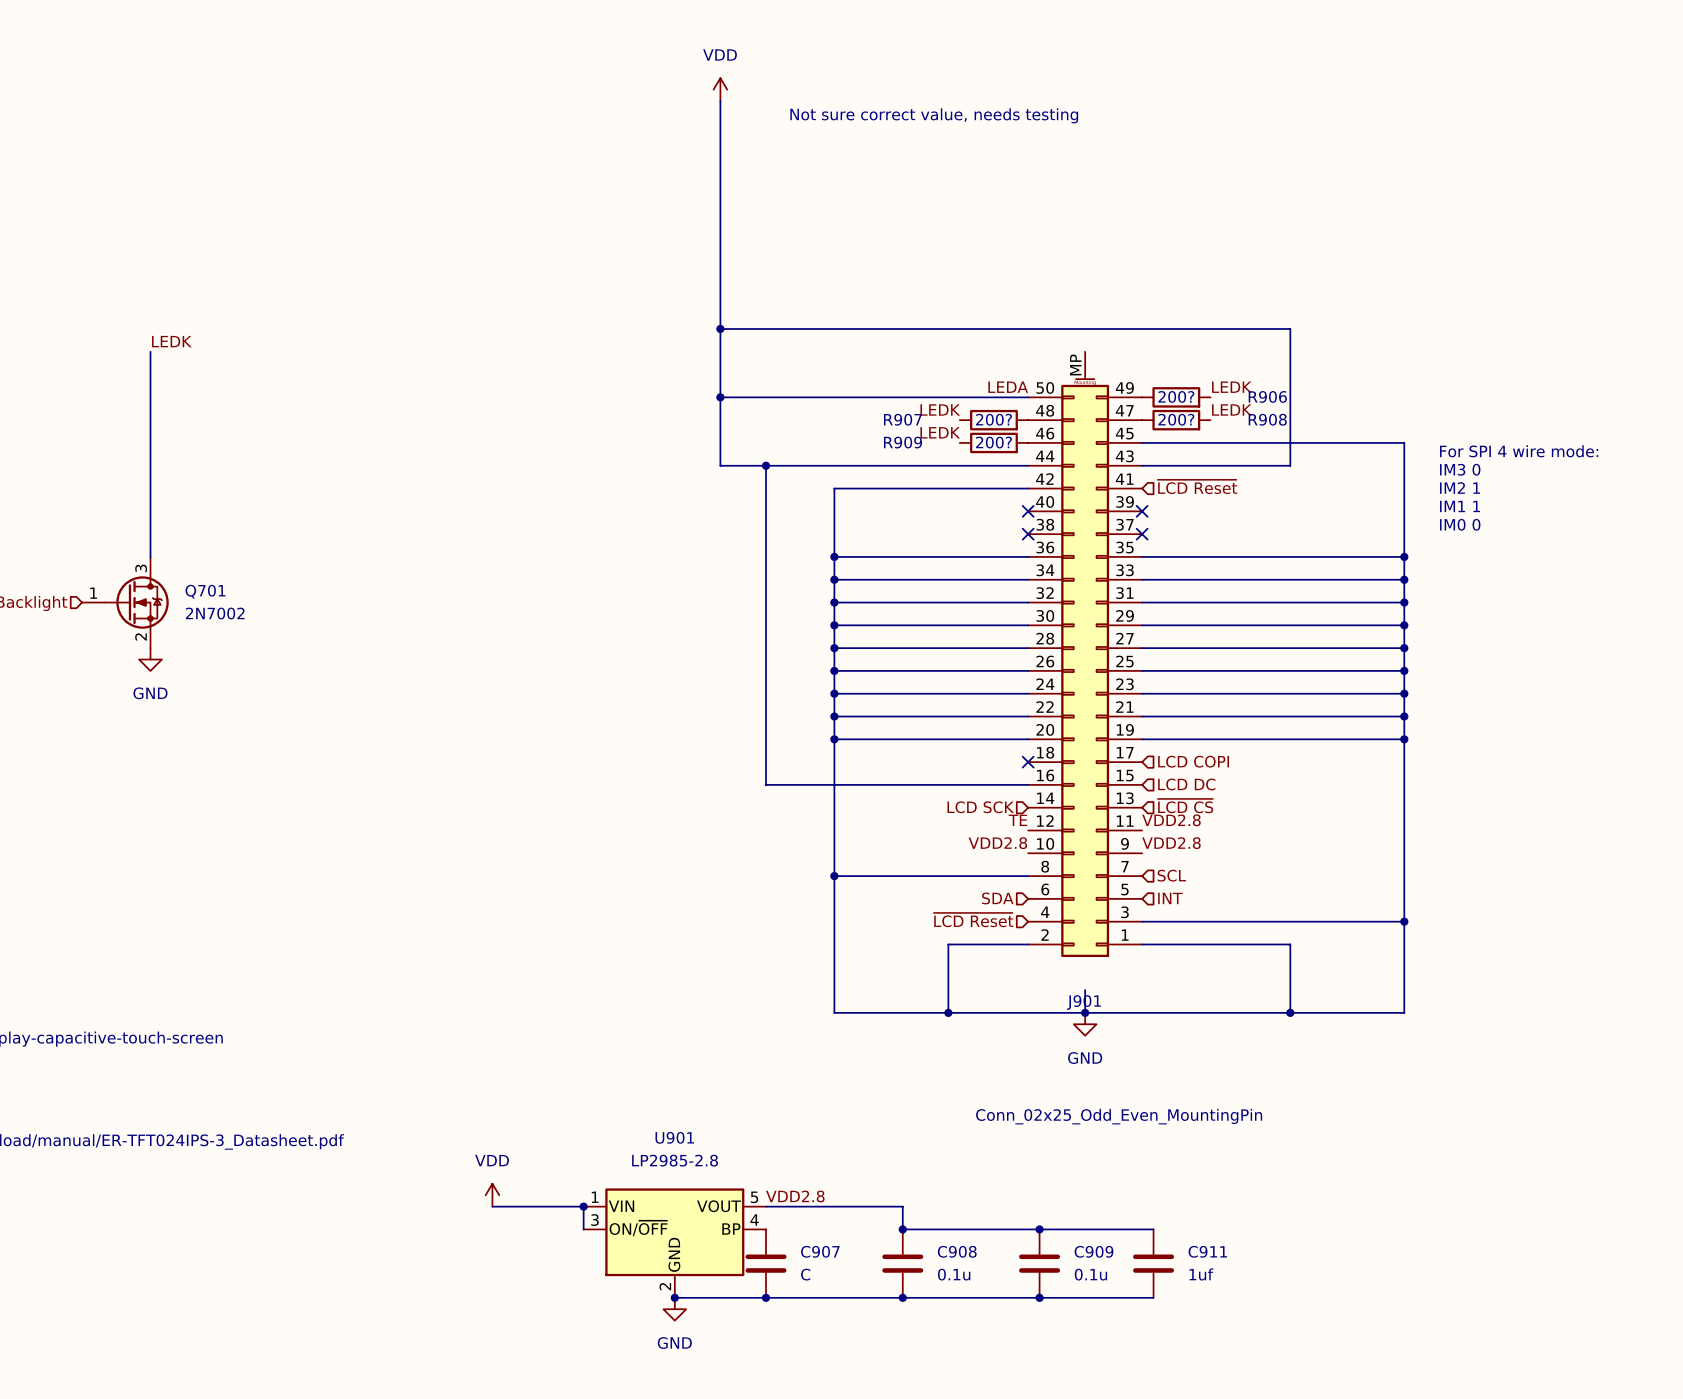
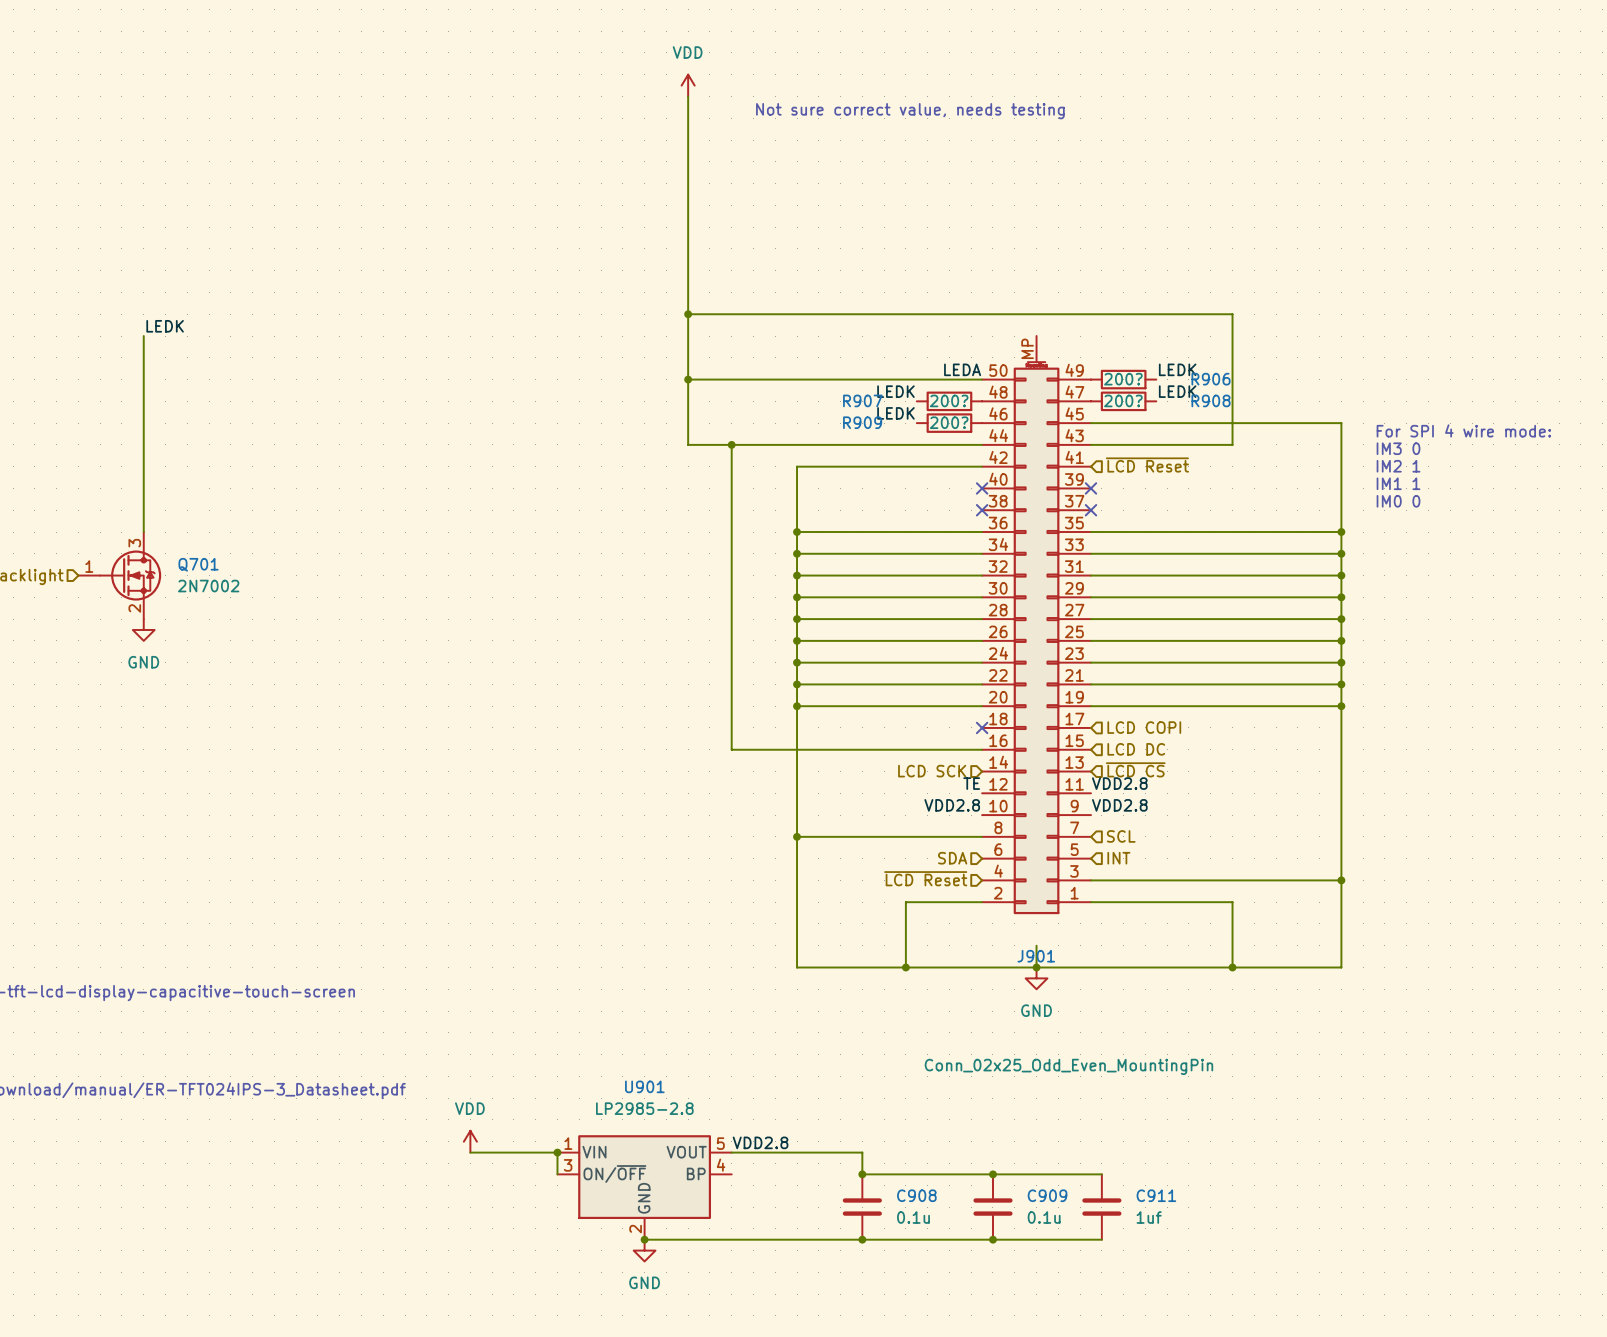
C907: C (766, 1263) -> none
junction: (766, 1297) -> none

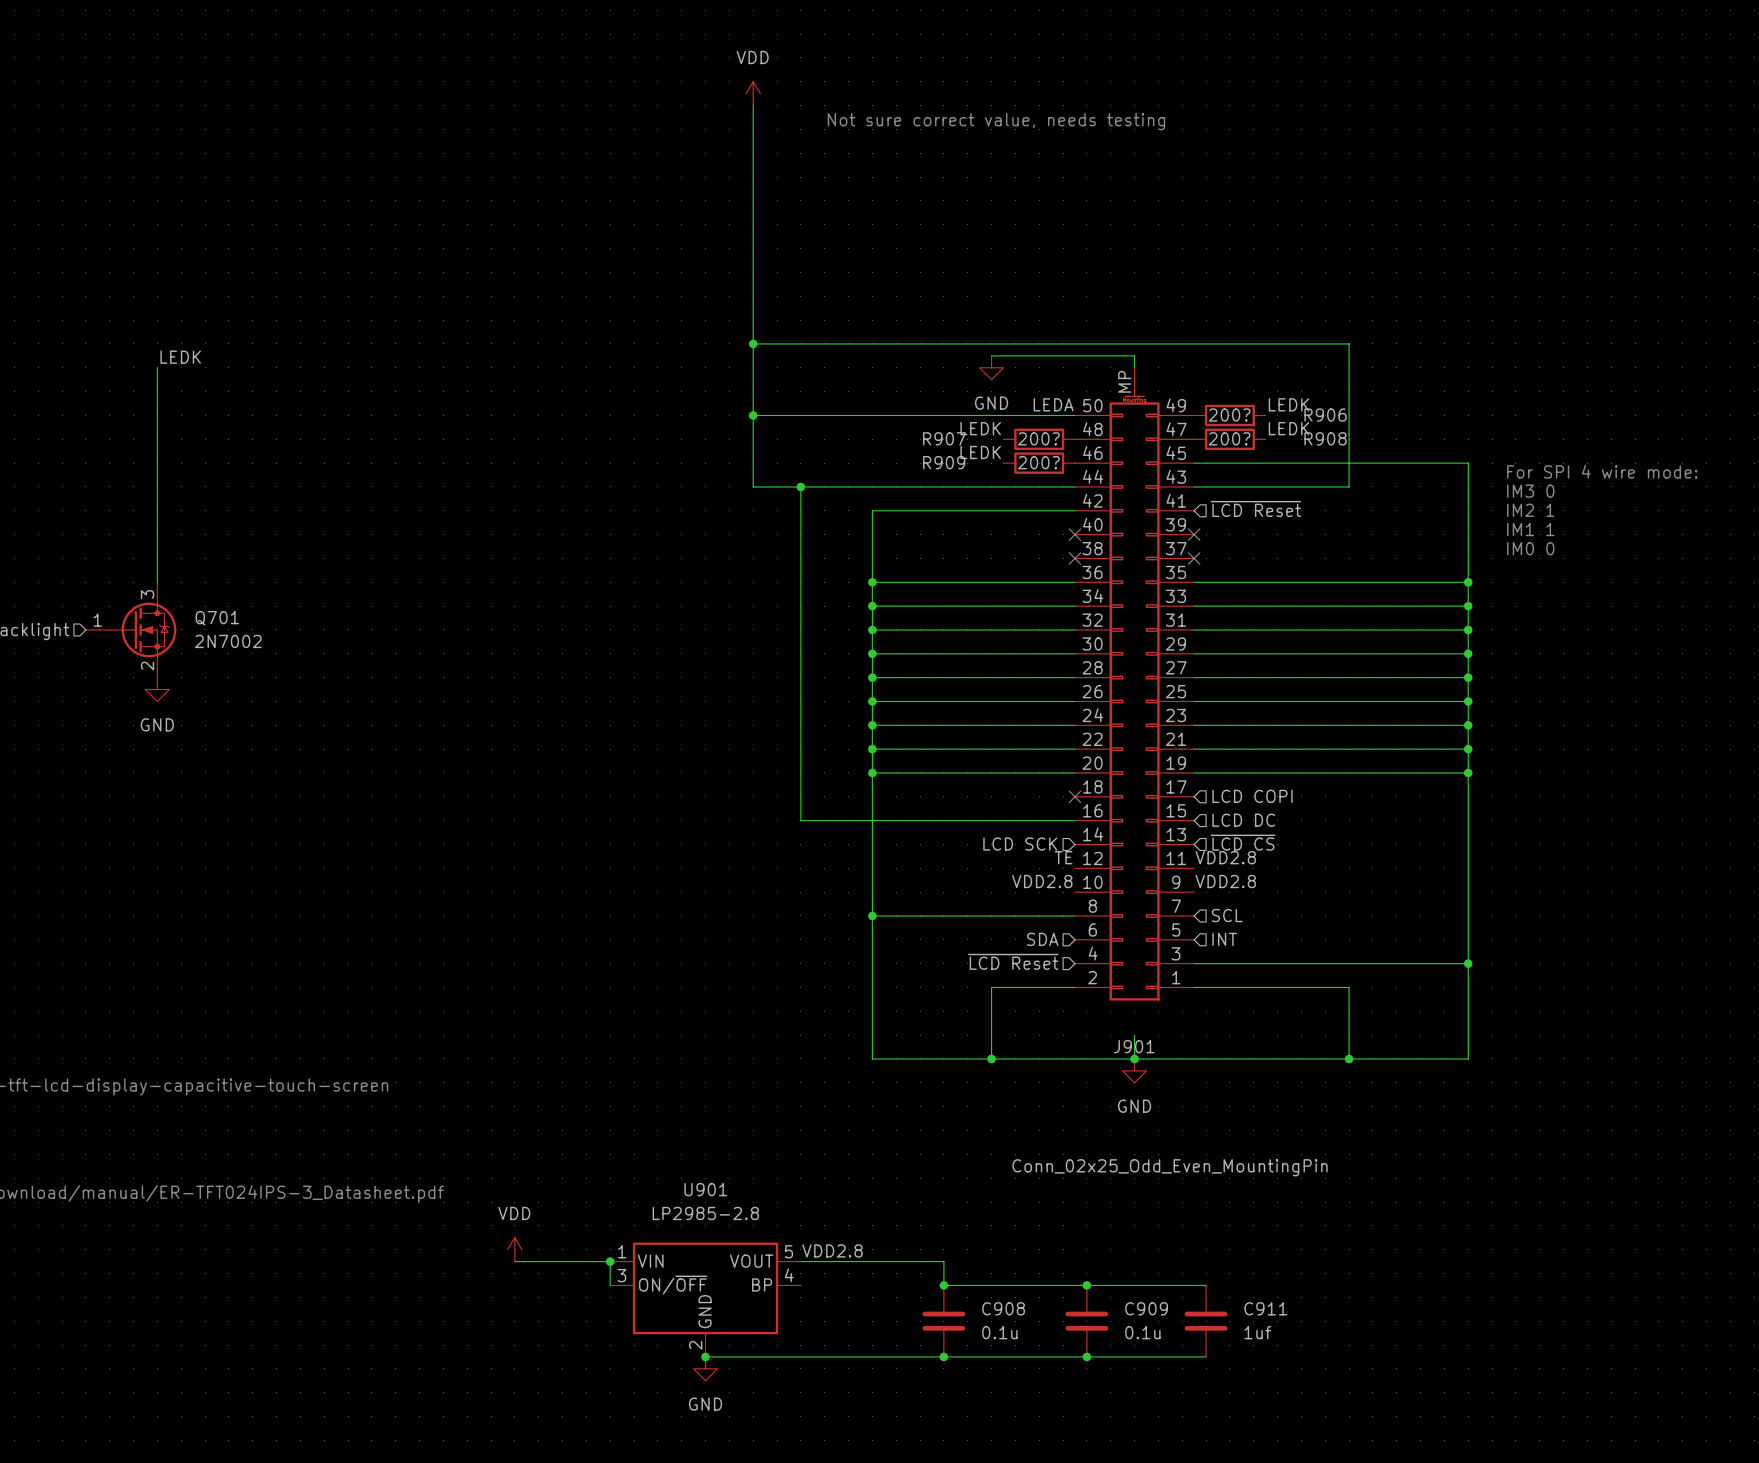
wire: none -> (991, 355) (1134, 355) (1134, 367)
power symbol: none -> GND (991, 367)

